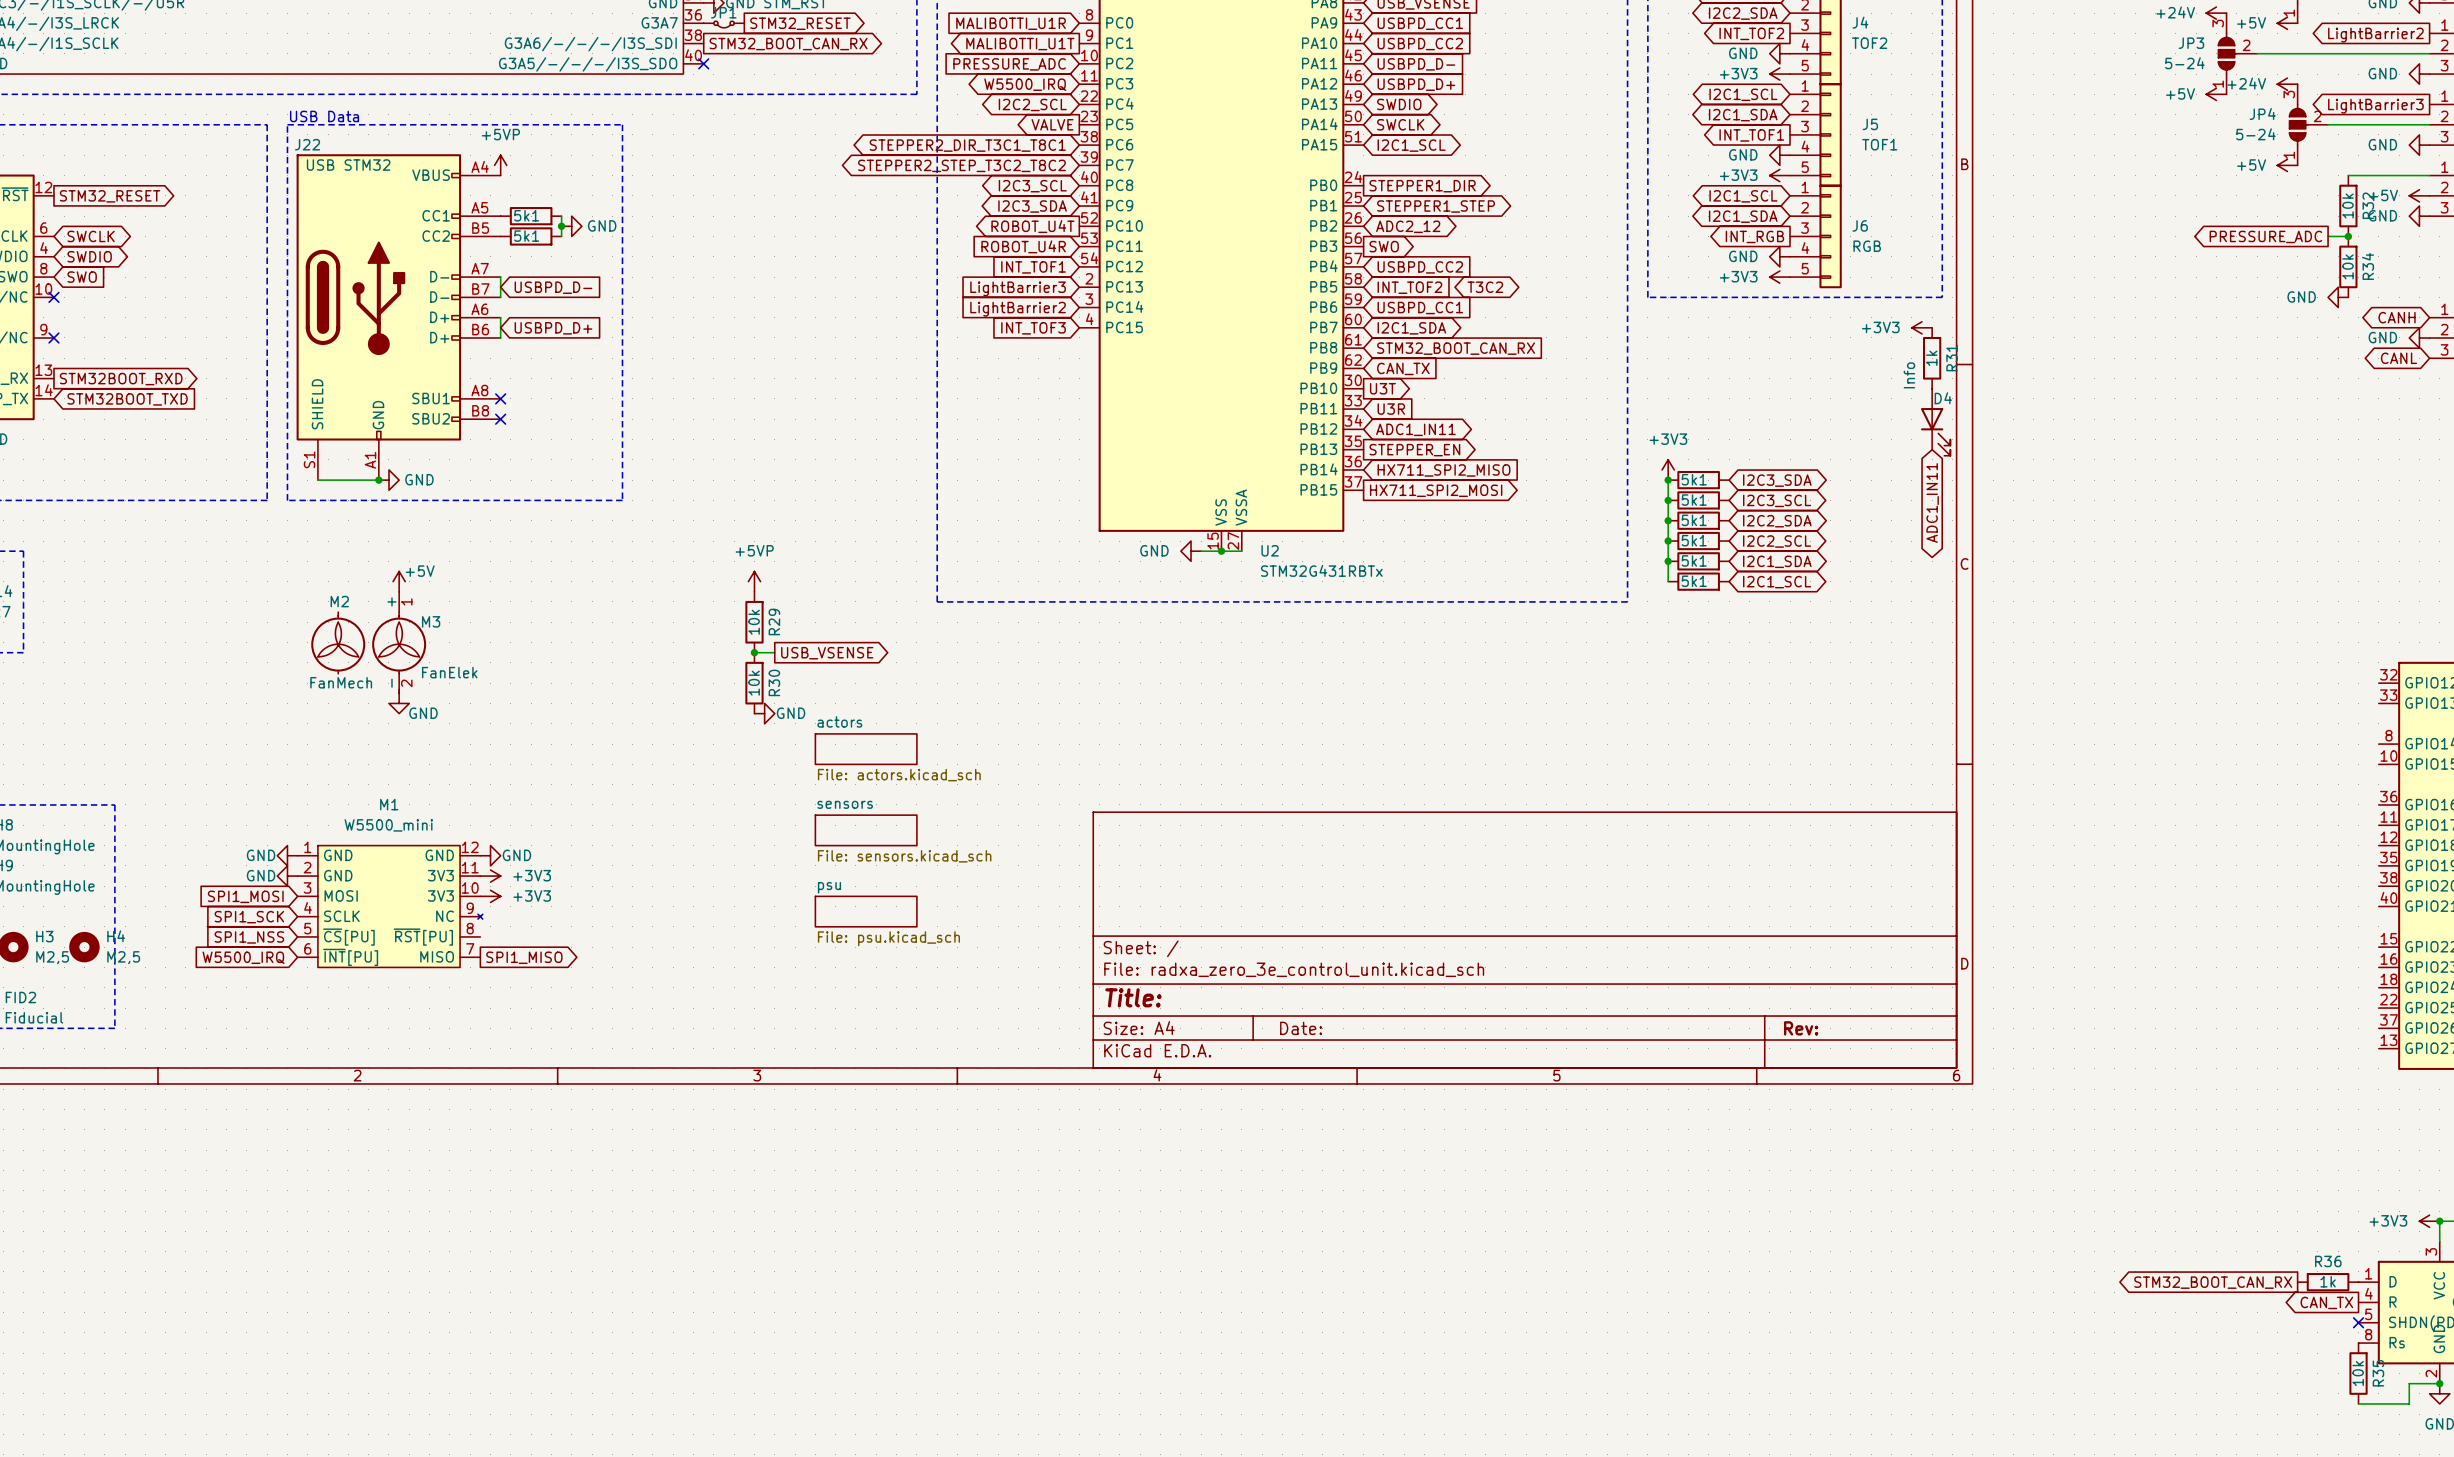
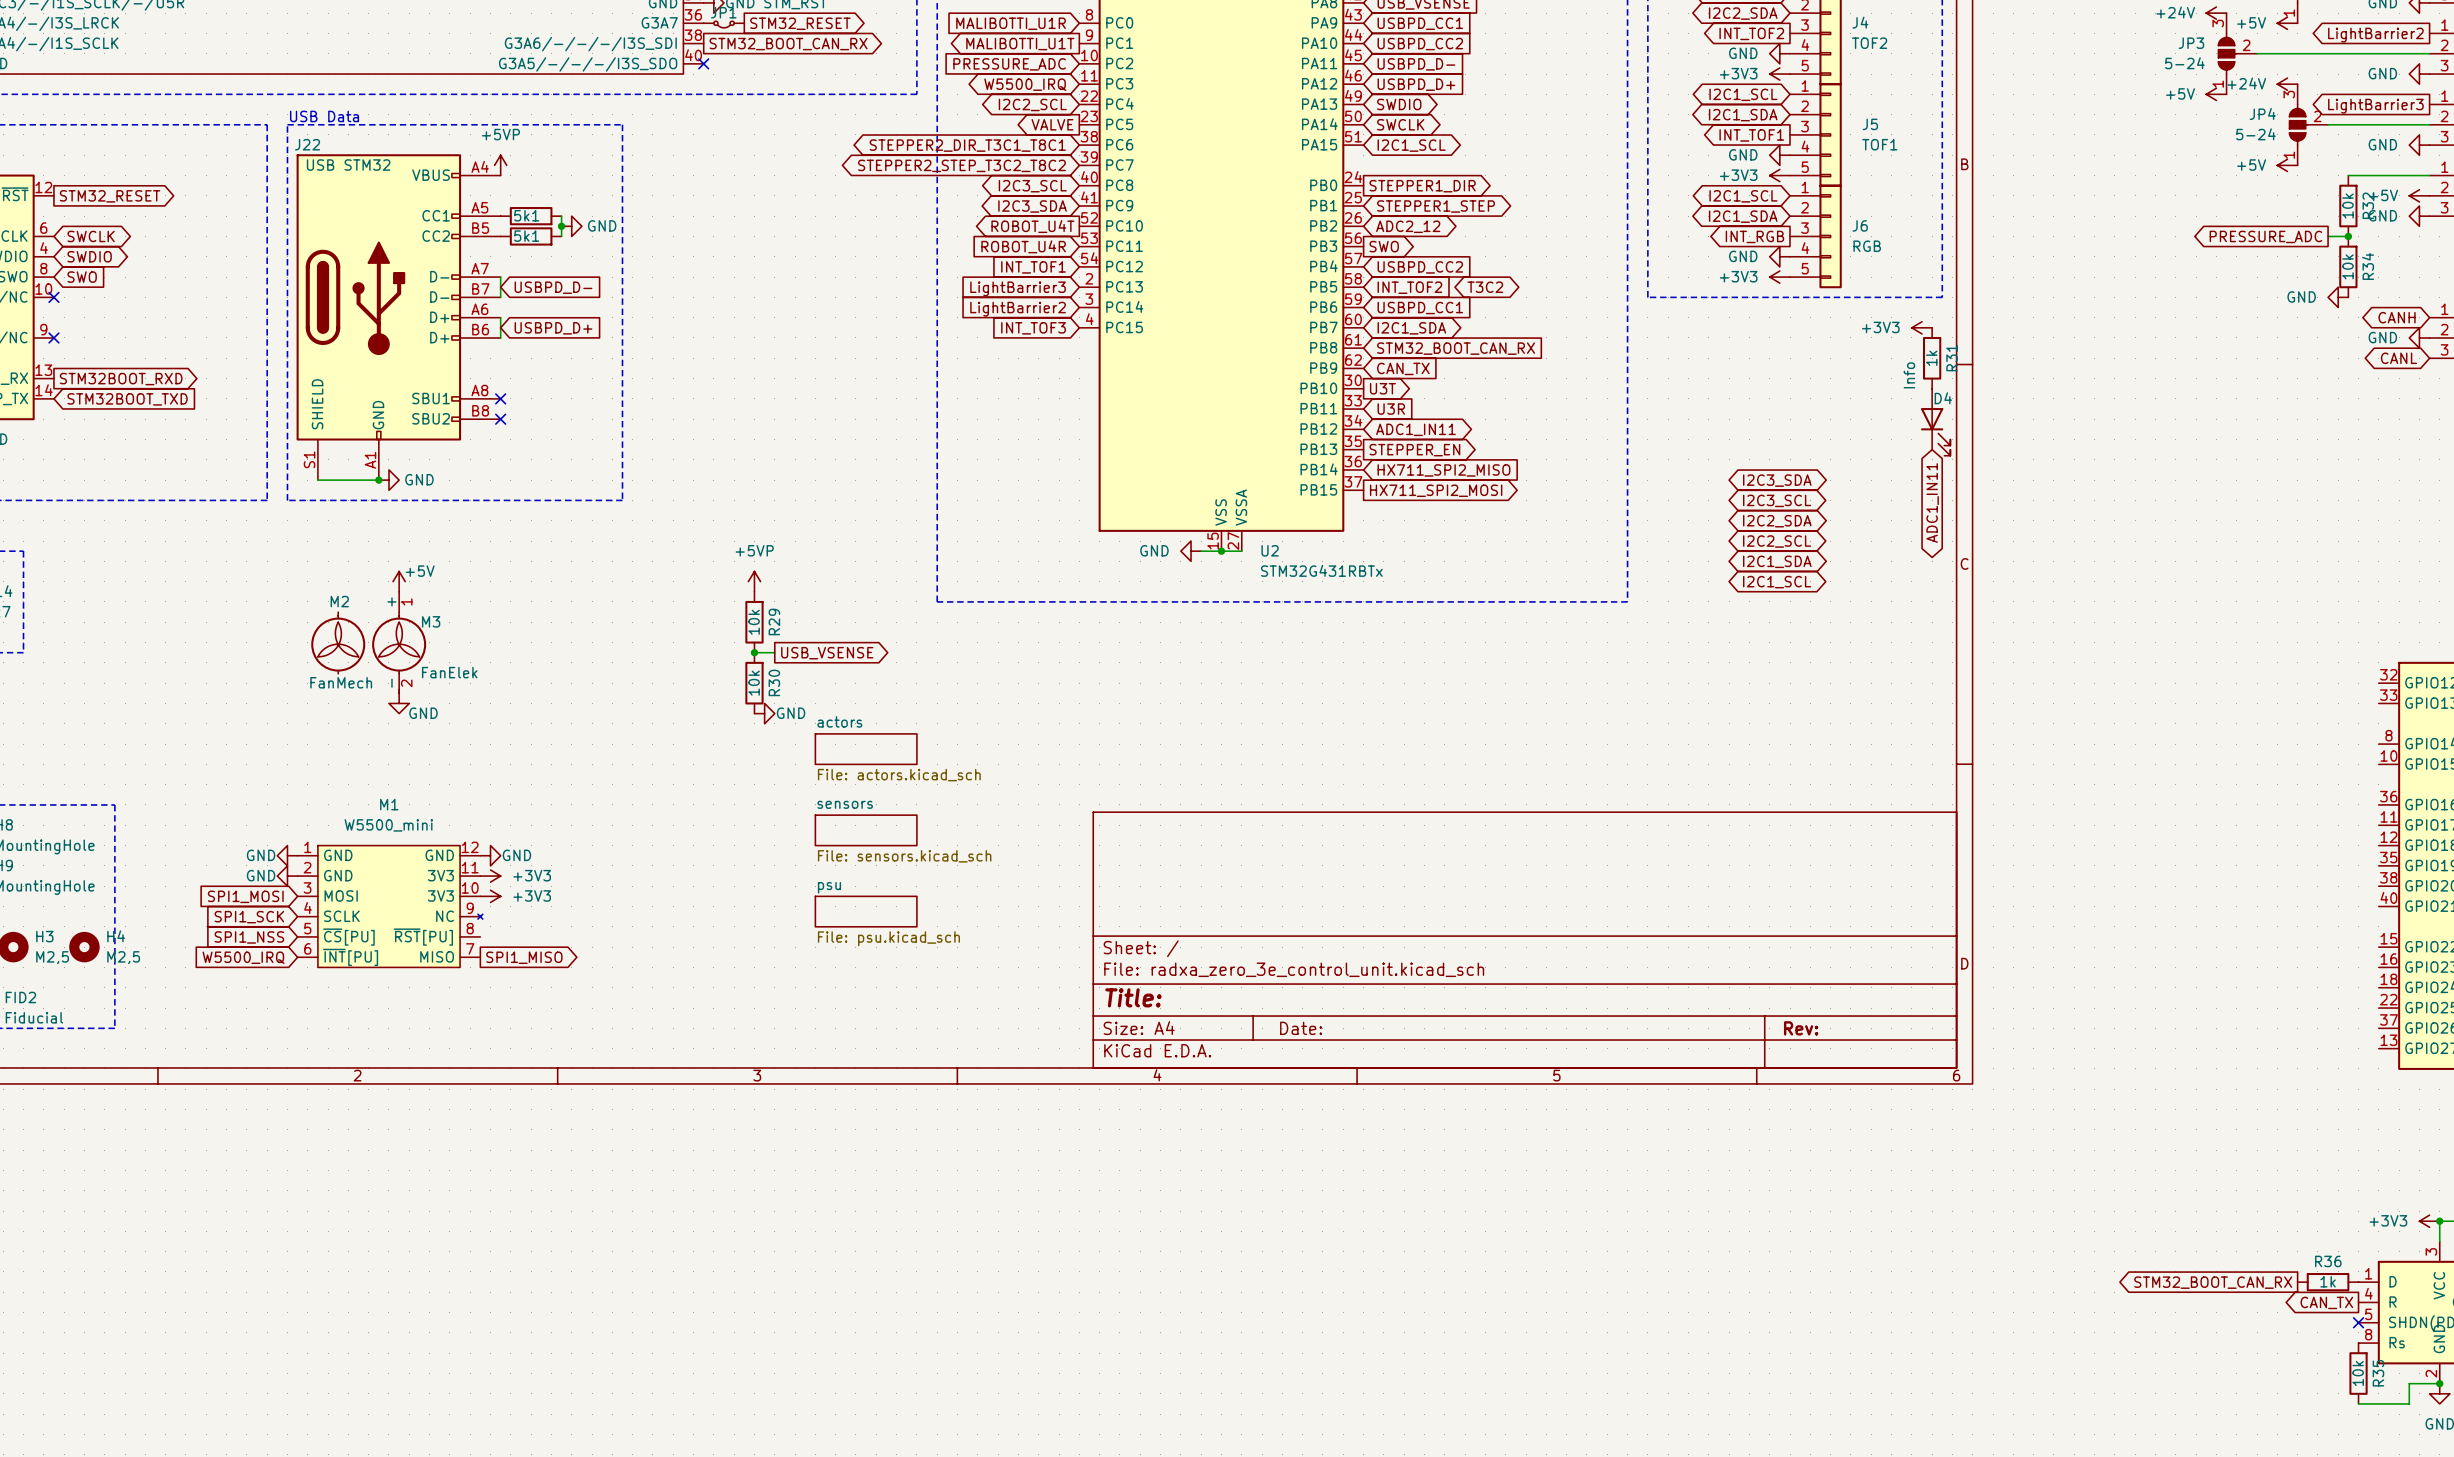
power symbol: +3V3 (1668, 469) -> none
wire: (1668, 480) (1668, 581) -> none
junction: (1668, 480) -> none
part: 5k1 (1698, 480) -> none
junction: (1668, 500) -> none
part: 5k1 (1698, 500) -> none
junction: (1668, 520) -> none
part: 5k1 (1698, 520) -> none
junction: (1668, 541) -> none
part: 5k1 (1698, 541) -> none
junction: (1668, 561) -> none
part: 5k1 (1698, 561) -> none
part: 5k1 (1698, 581) -> none

